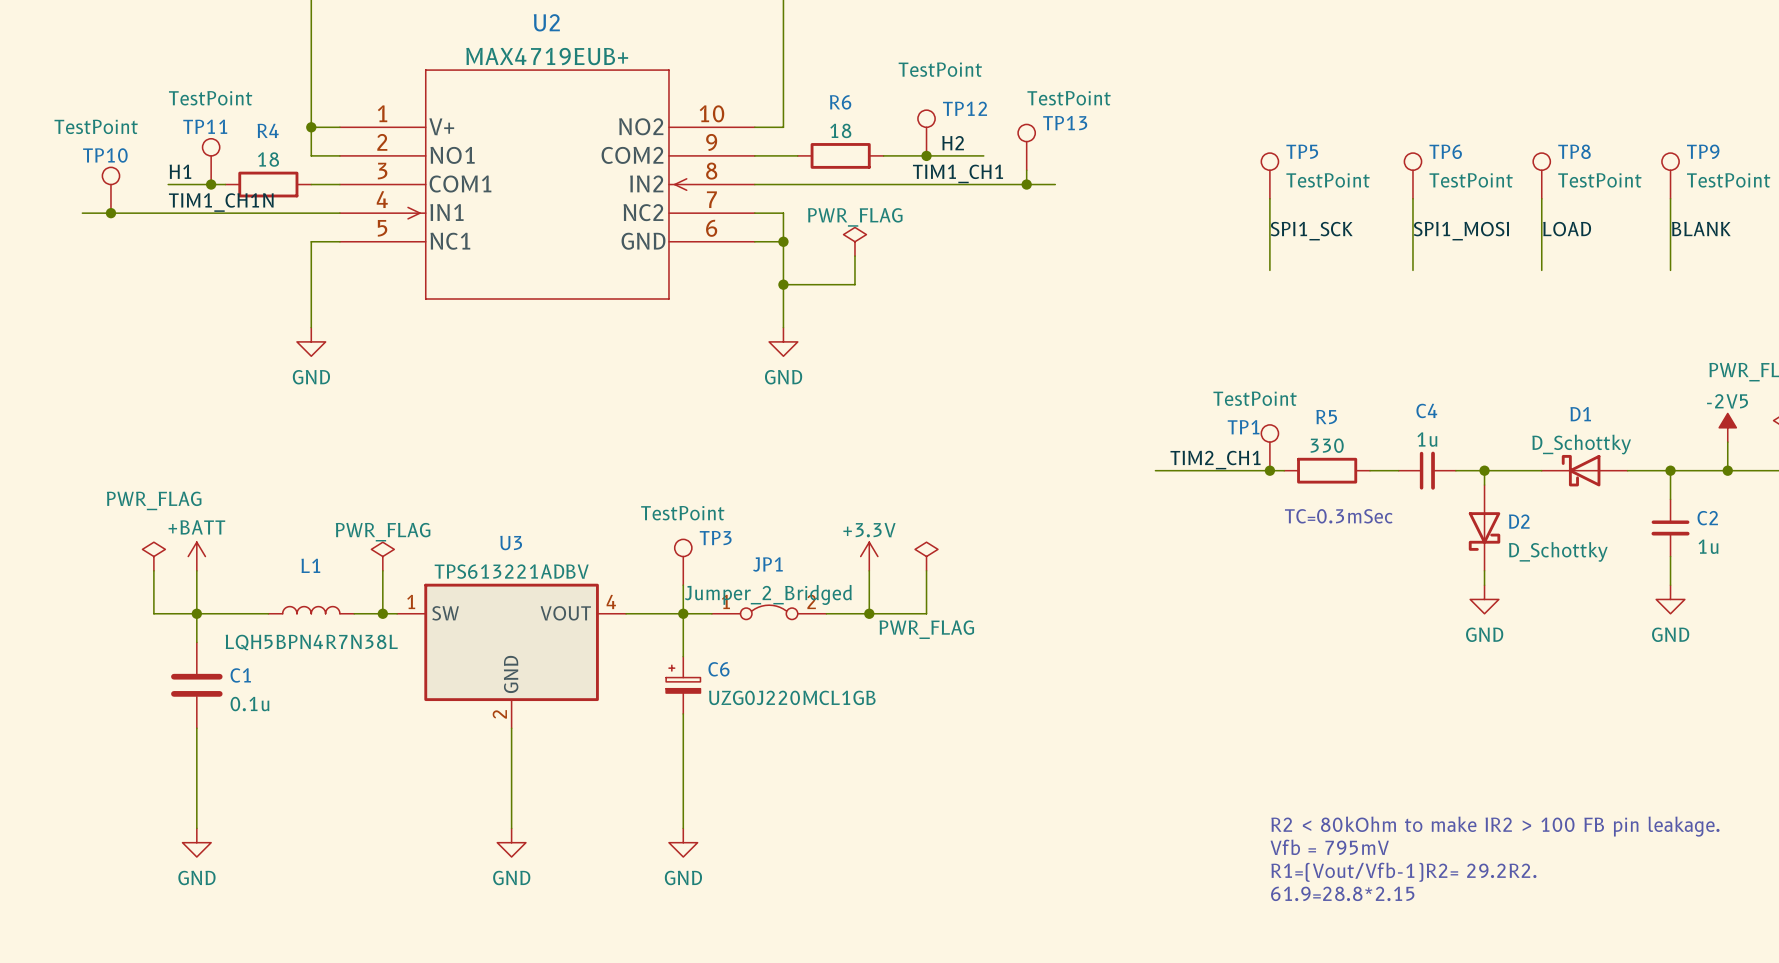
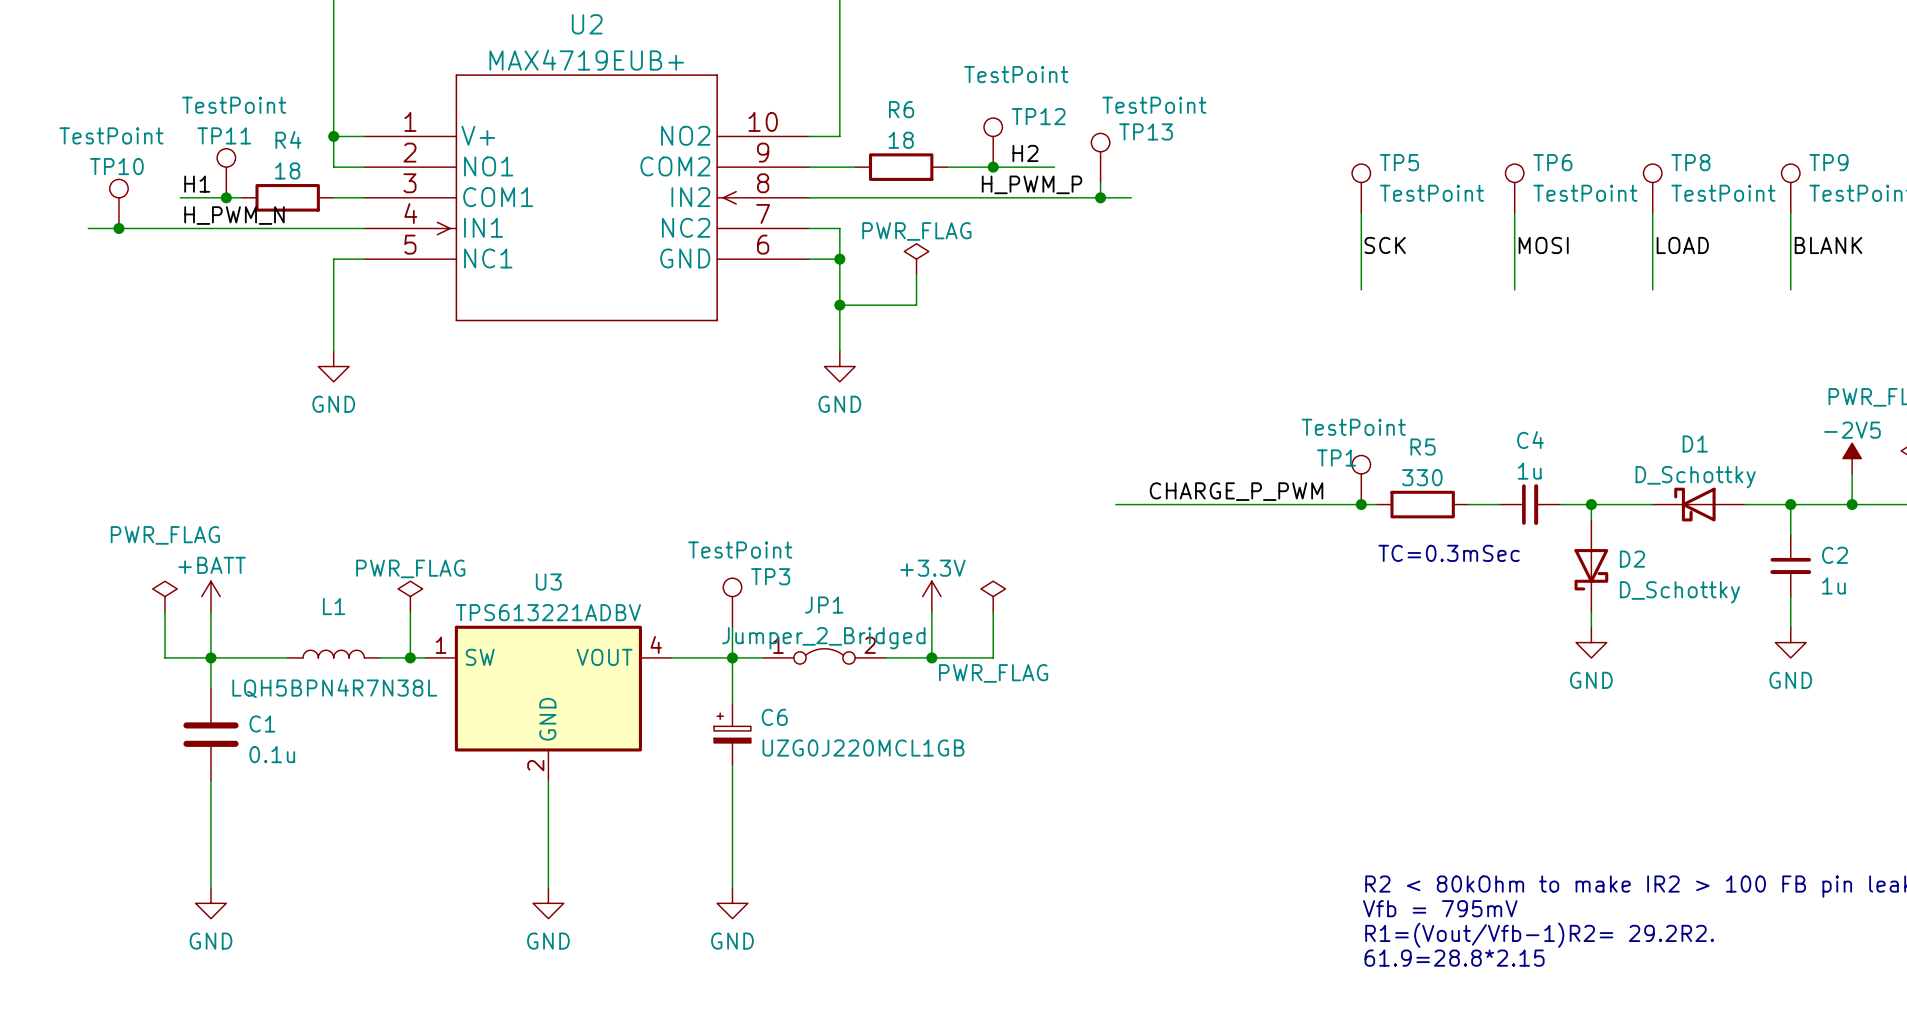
label: TIM1_CH1 (958, 173) -> H_PWM_P (1032, 184)
label: TIM1_CH1N (221, 202) -> H_PWM_N (234, 215)
label: SPI1_SCK (1311, 231) -> SCK (1385, 245)
label: SPI1_MOSI (1461, 231) -> MOSI (1543, 245)
label: none -> CHARGE_P_PWM (1236, 491)
label: TIM2_CH1 (1215, 460) -> none
wire: none -> (1115, 504) (1238, 504)

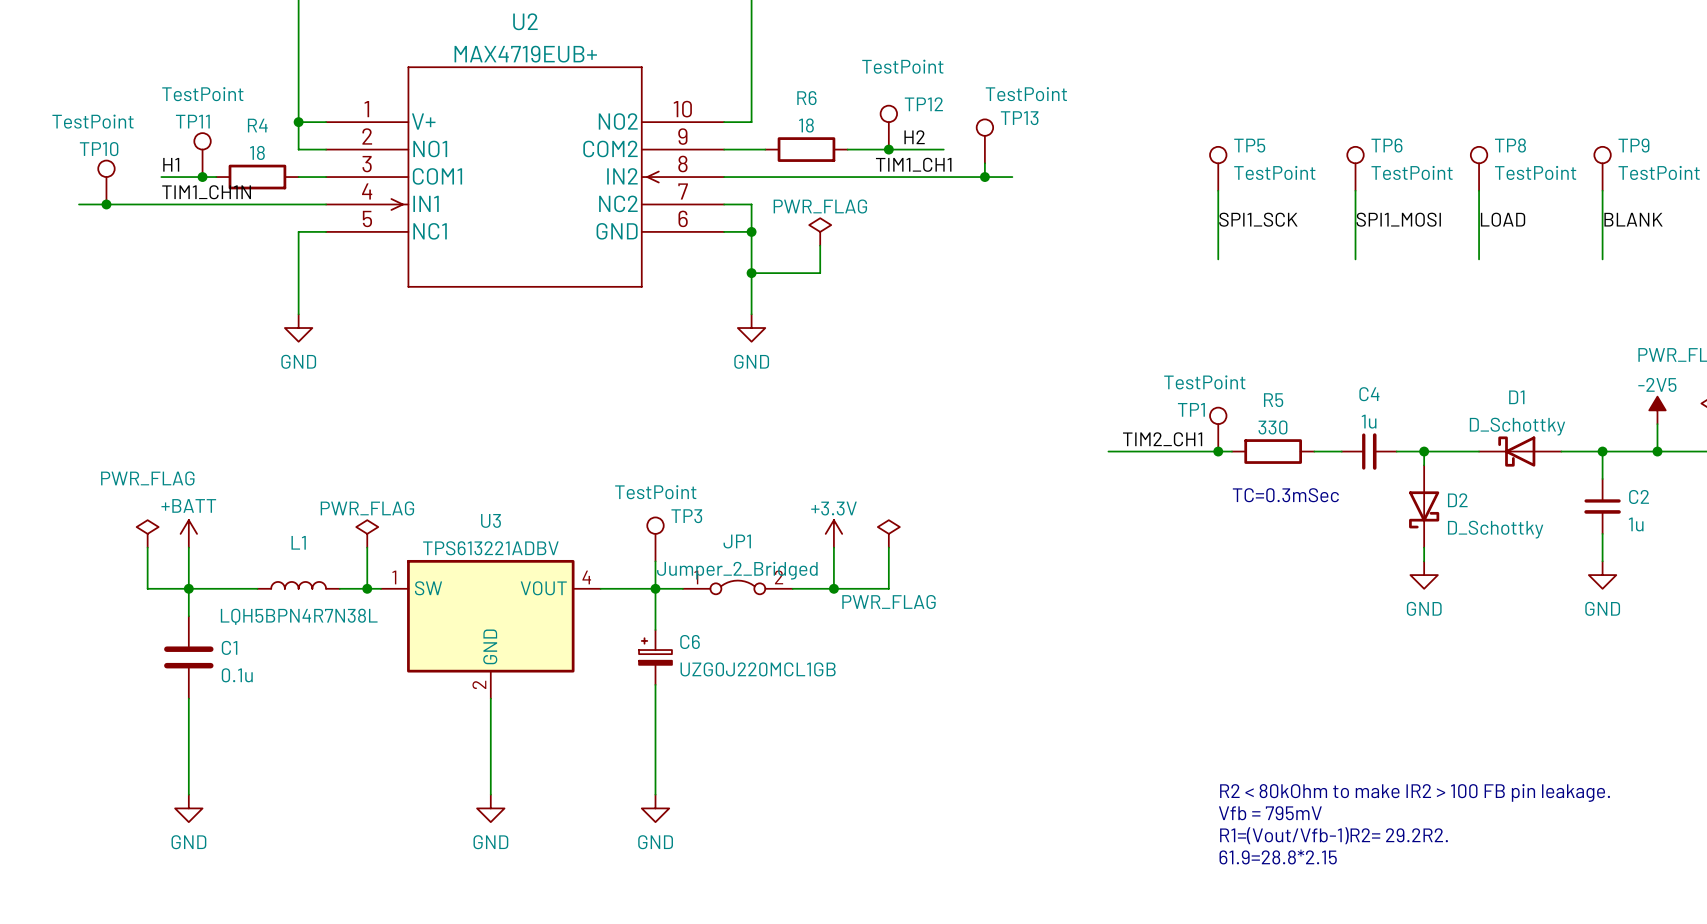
label: H_PWM_P (1032, 184) -> TIM1_CH1 (913, 164)
label: H_PWM_N (234, 215) -> TIM1_CH1N (206, 192)
label: SCK (1385, 245) -> SPI1_SCK (1258, 219)
label: MOSI (1543, 245) -> SPI1_MOSI (1398, 219)
label: CHARGE_P_PWM (1236, 491) -> none
label: none -> TIM2_CH1 (1162, 439)
wire: (1115, 504) (1238, 504) -> none

